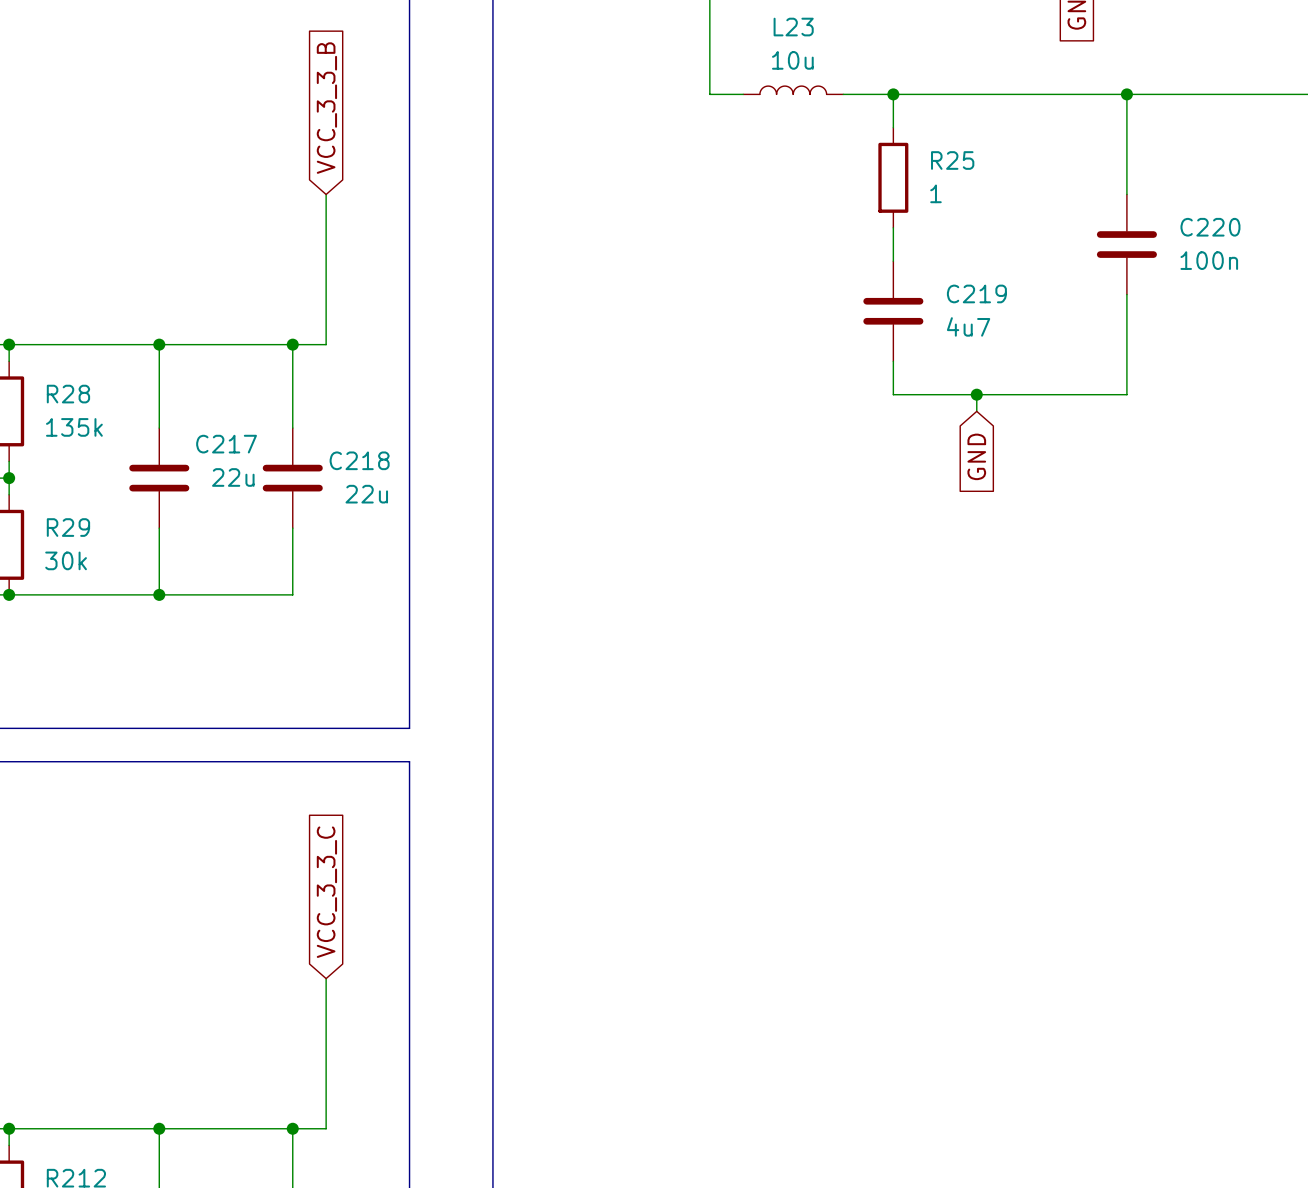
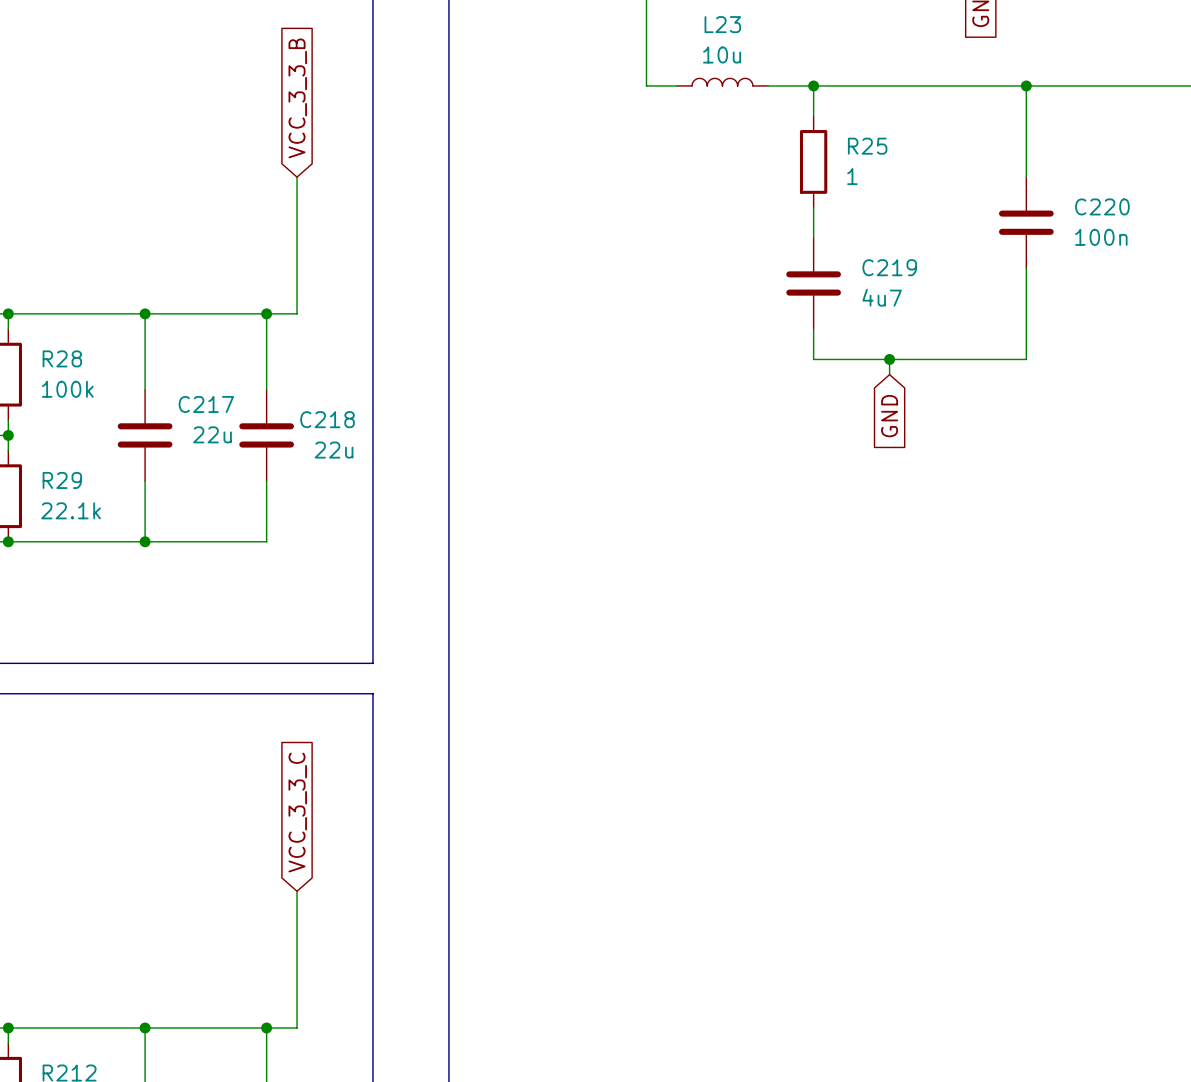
R28 value: 135k (74, 427) -> 100k (67, 389)
R29 value: 30k (66, 560) -> 22.1k (71, 510)

